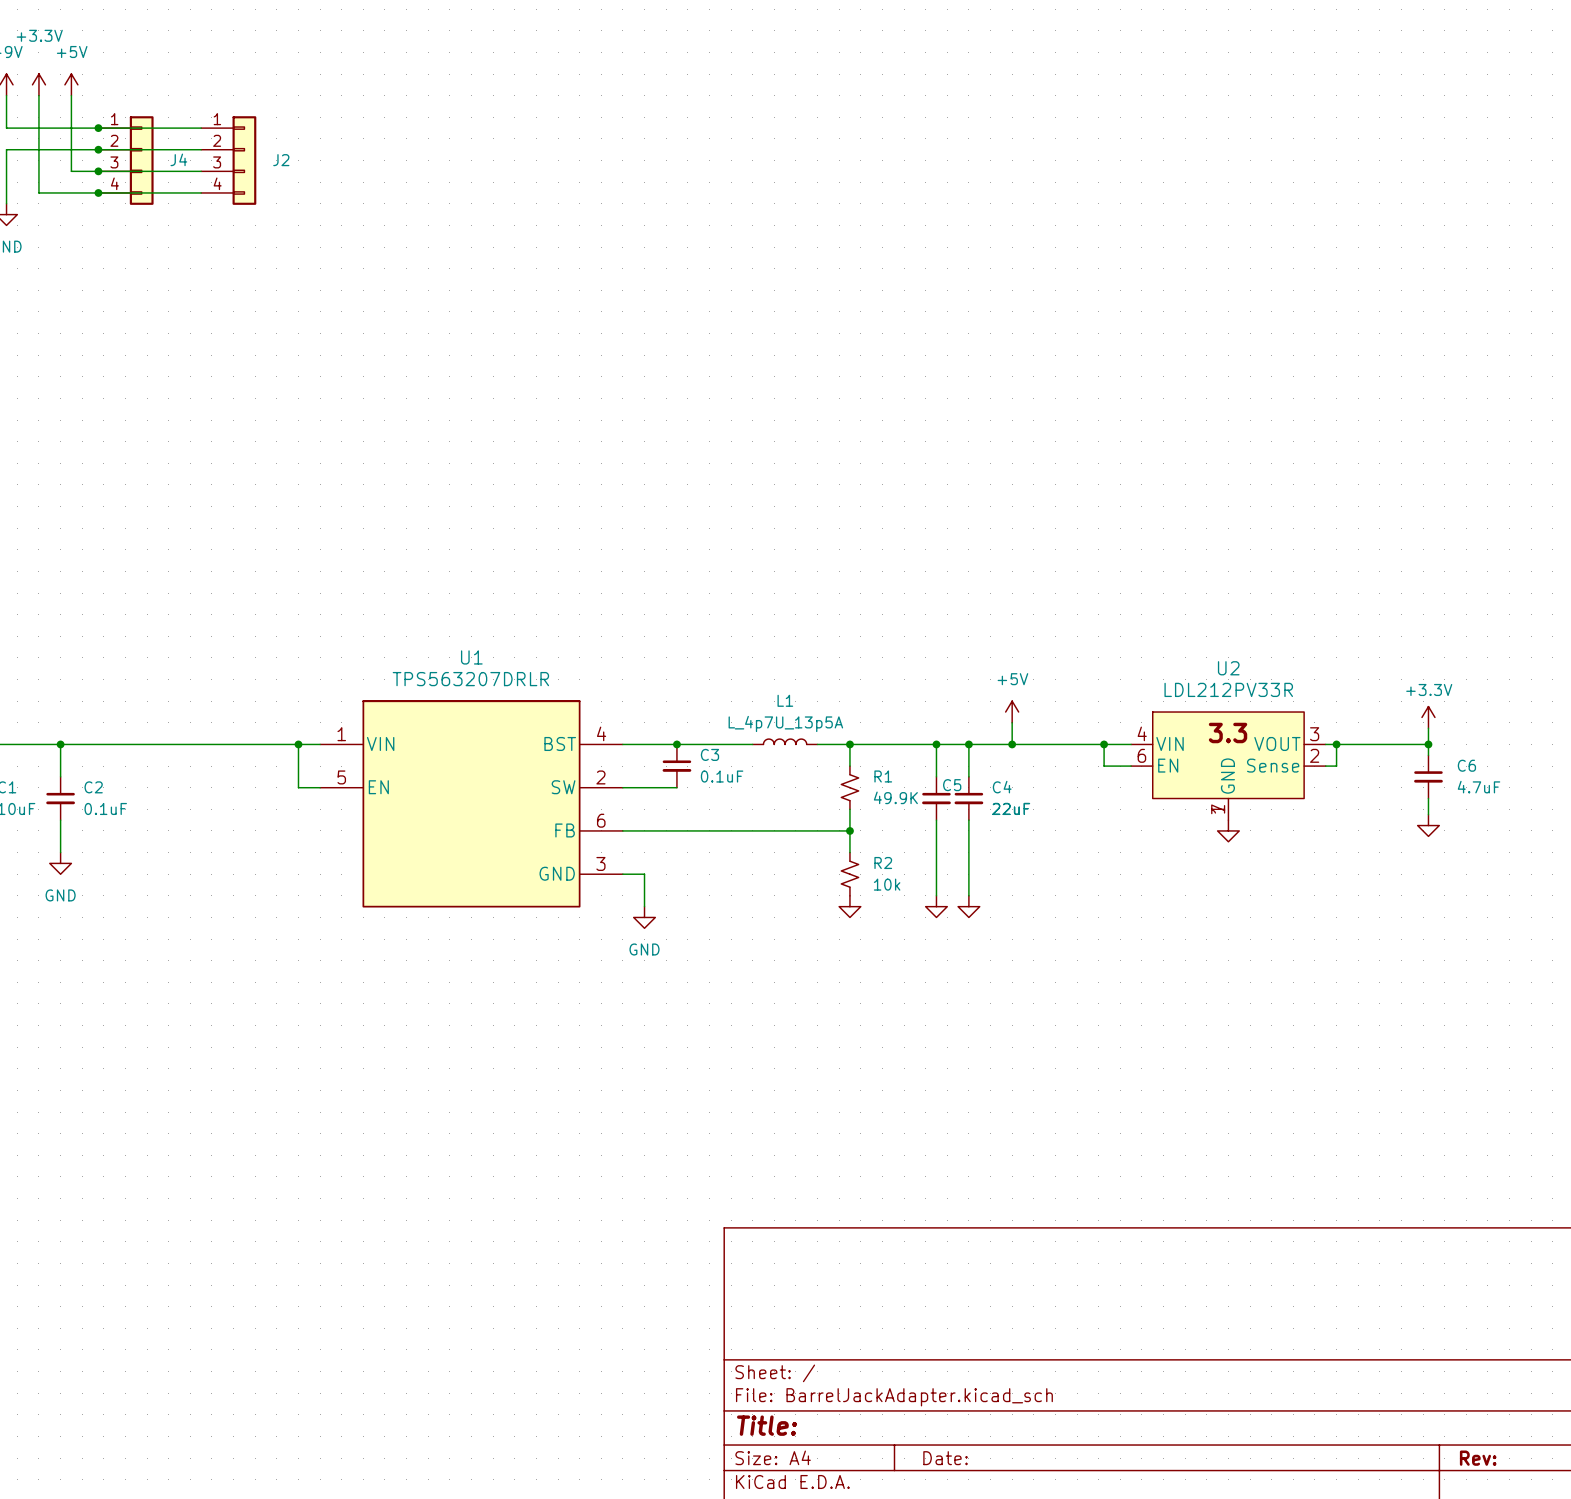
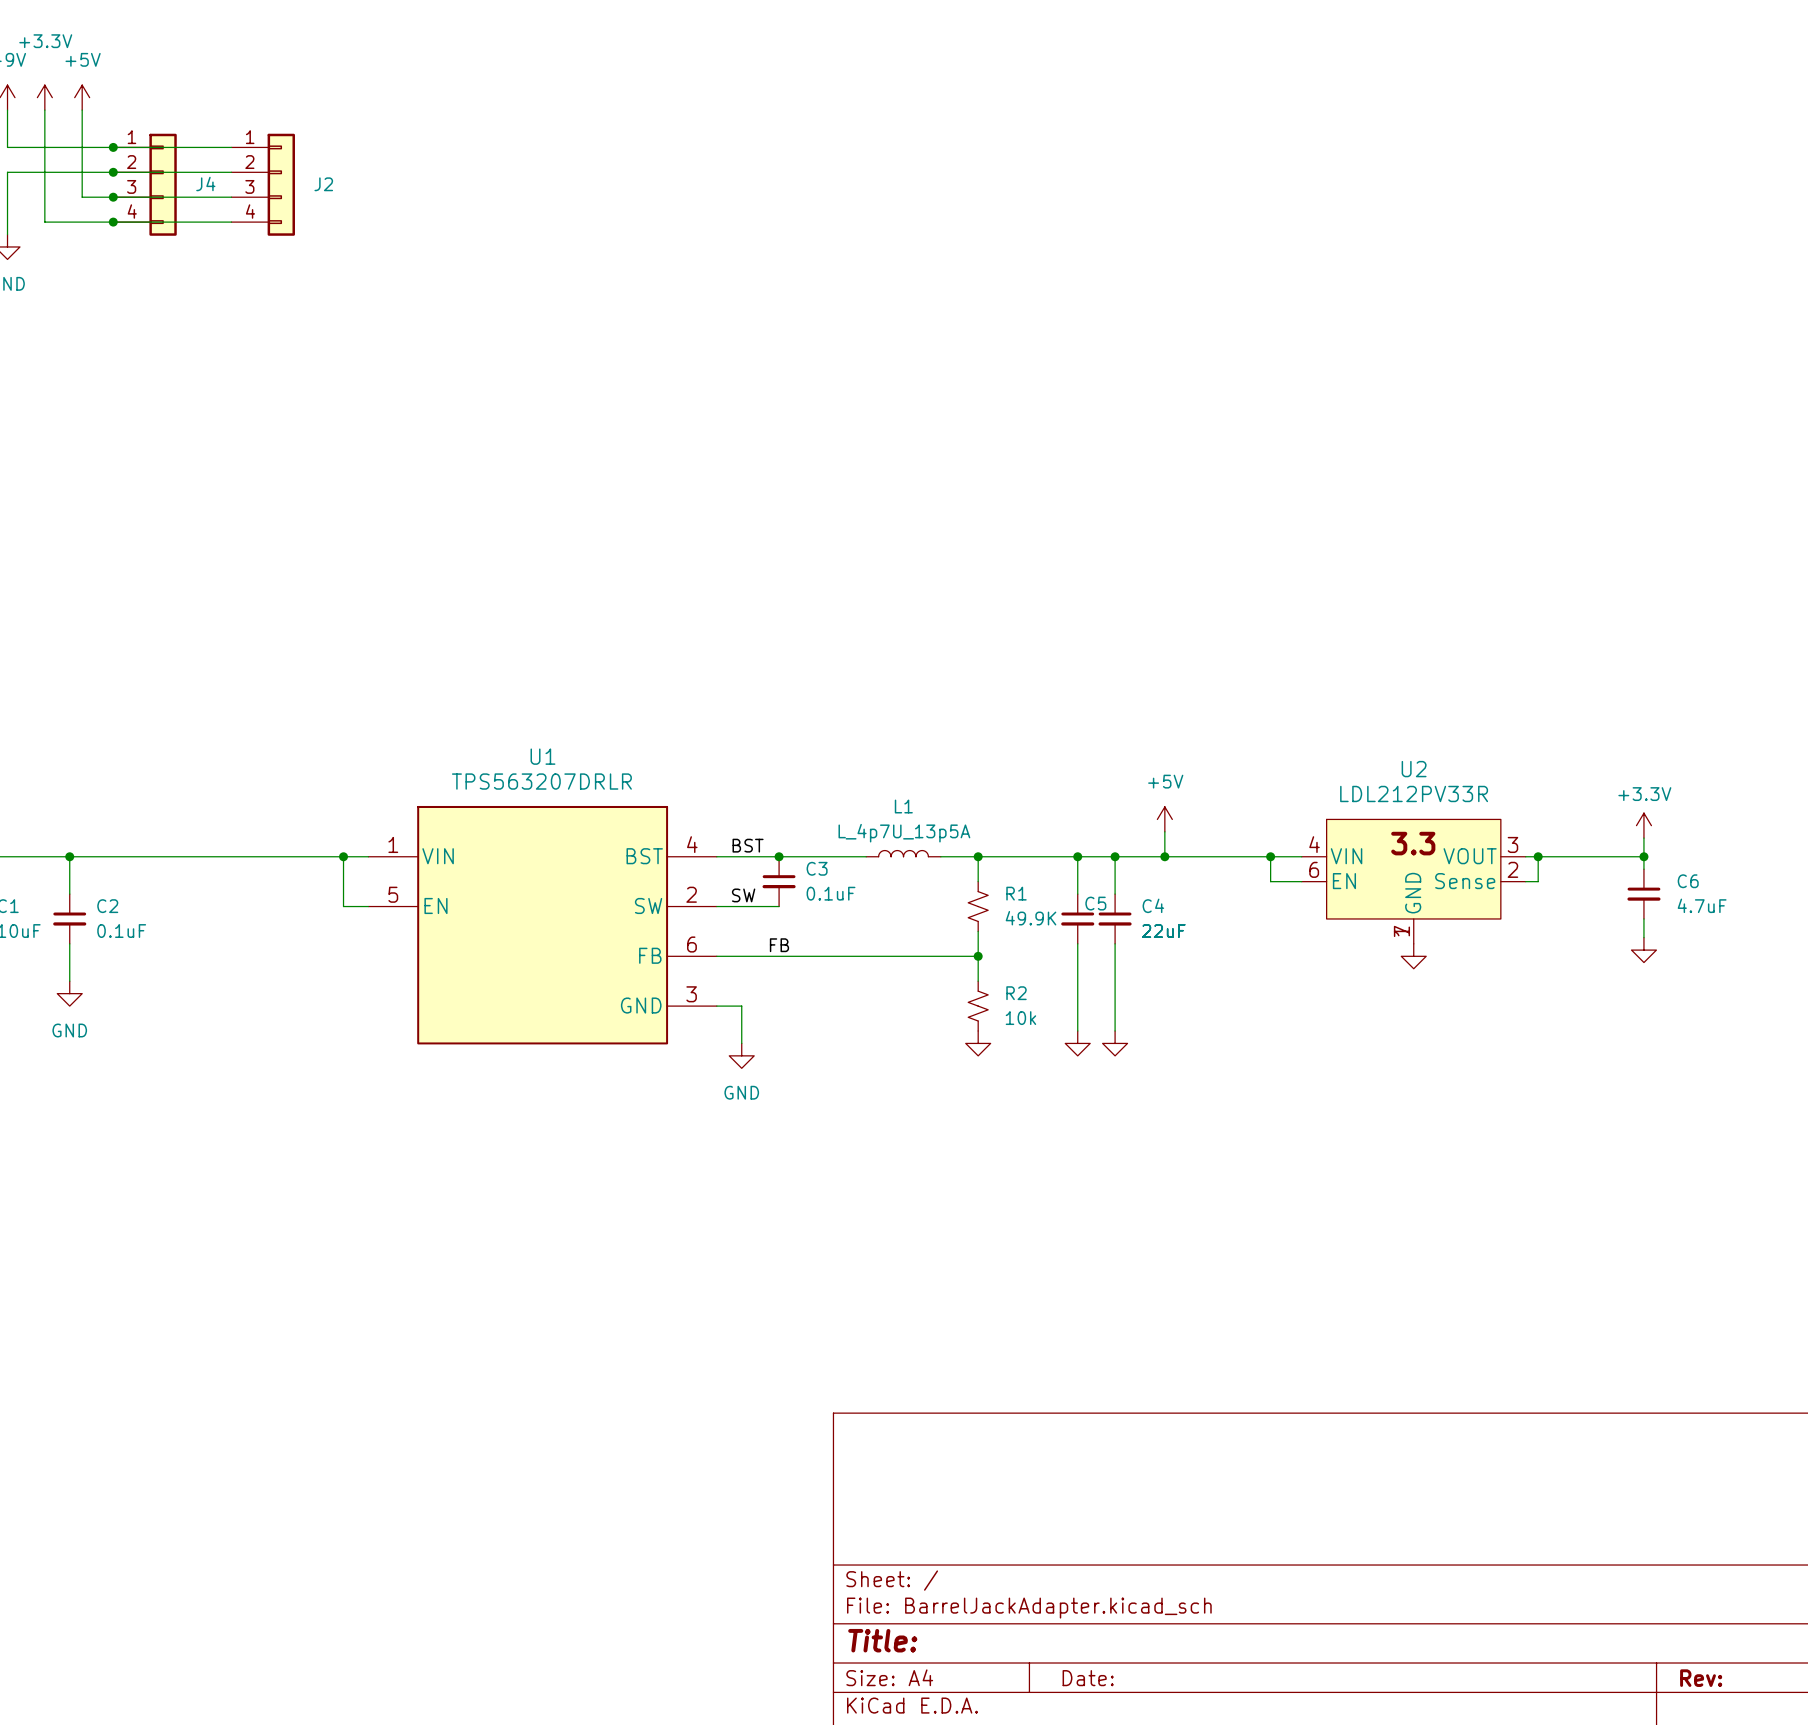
label: none -> BST (748, 845)
label: none -> SW (743, 895)
label: none -> FB (779, 945)

